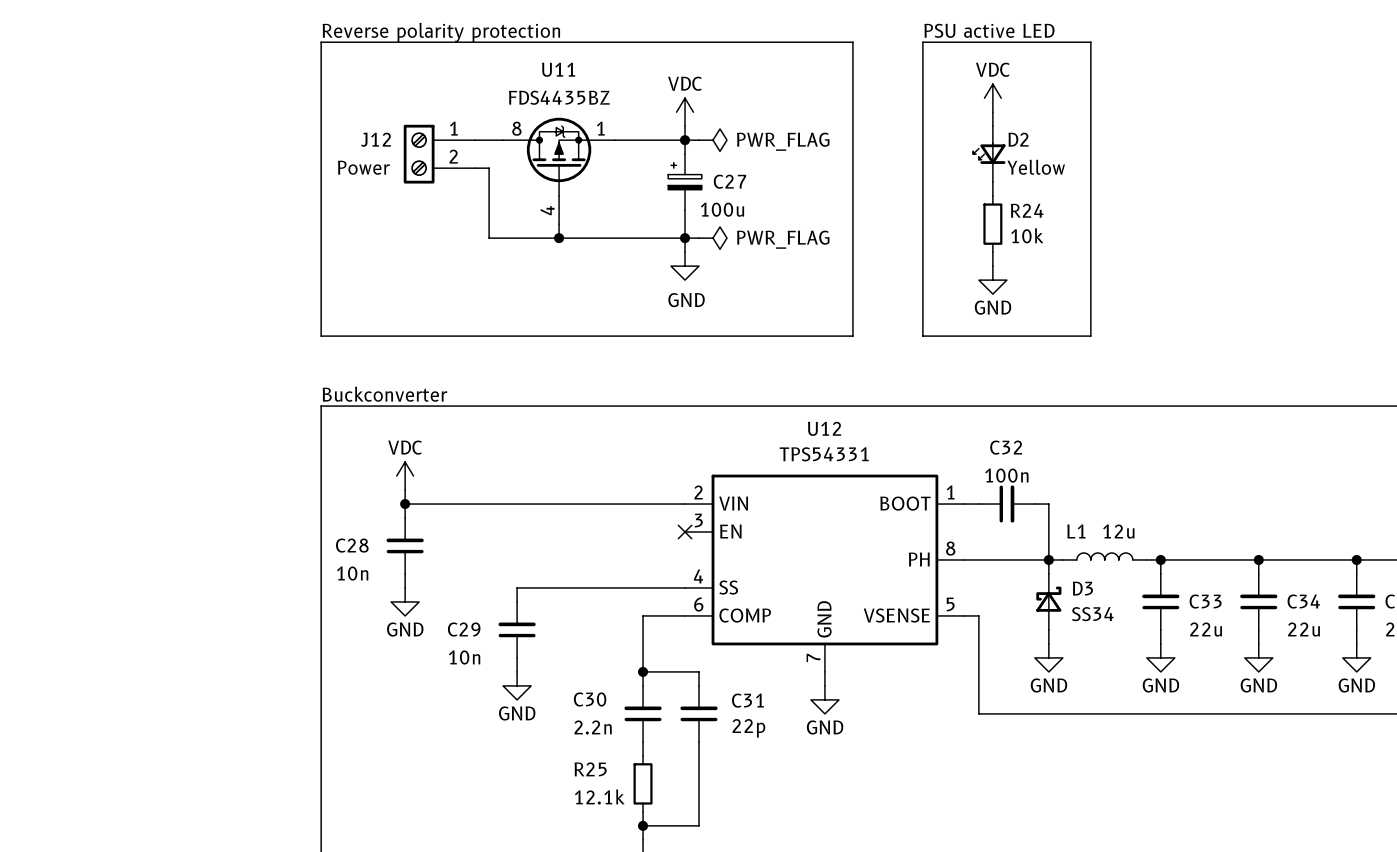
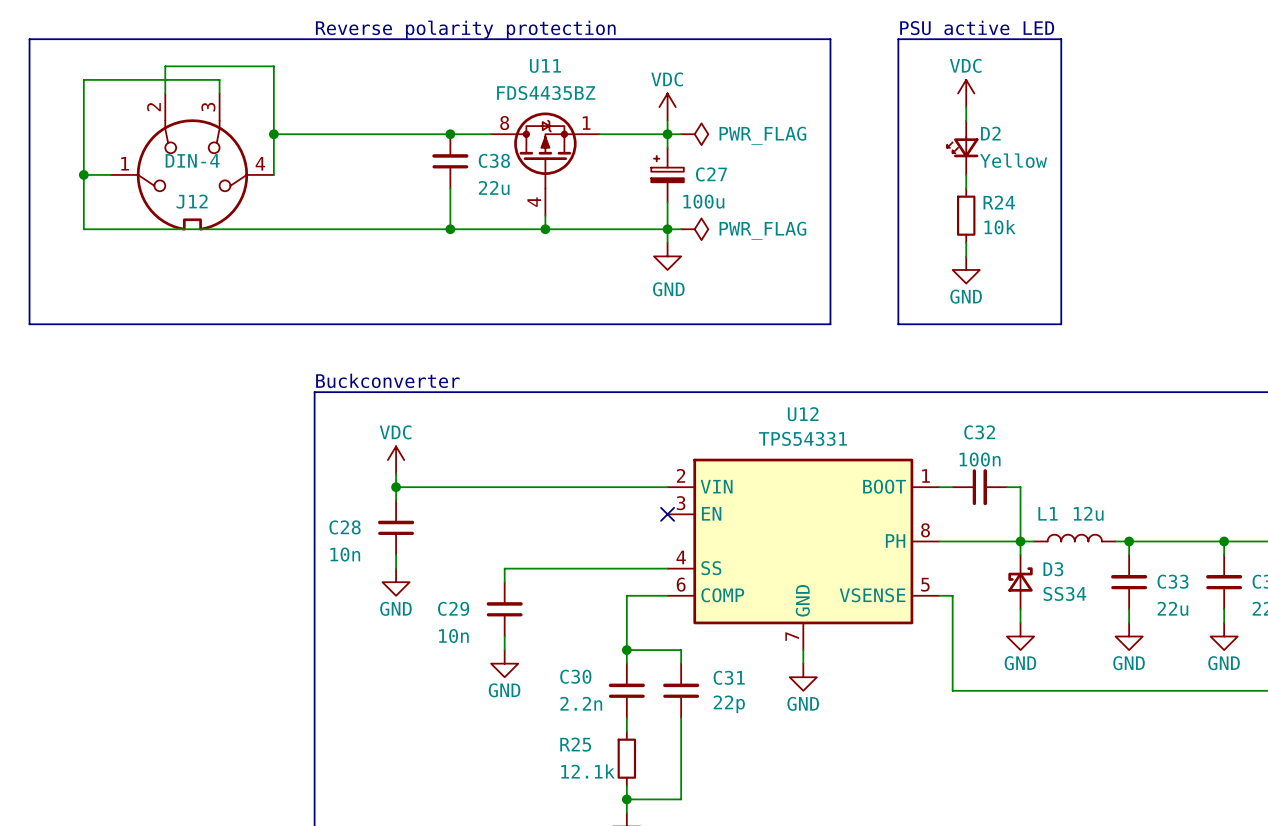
line: (321, 42) (321, 336) -> (314, 39) (29, 39) (29, 324) (314, 324)
wire: none -> (165, 93) (165, 66) (273, 66) (273, 174)
J12 symbol: [403, 124, 476, 184] -> [110, 93, 274, 231]
J12 name position: J12 (376, 139) -> J12 (192, 201)
wire: none -> (273, 134) (463, 134)
junction: none -> (273, 134)
junction: none -> (450, 134)
J12 value: Power (363, 167) -> DIN-4 (192, 160)
C38: none -> 22u (450, 161)
wire: (475, 168) (489, 168) (489, 238) -> (219, 93) (219, 79) (83, 79) (83, 229) (477, 229)
wire: none -> (83, 174) (110, 174)
junction: none -> (83, 174)
wire: none -> (450, 188) (450, 229)
junction: none -> (450, 229)

